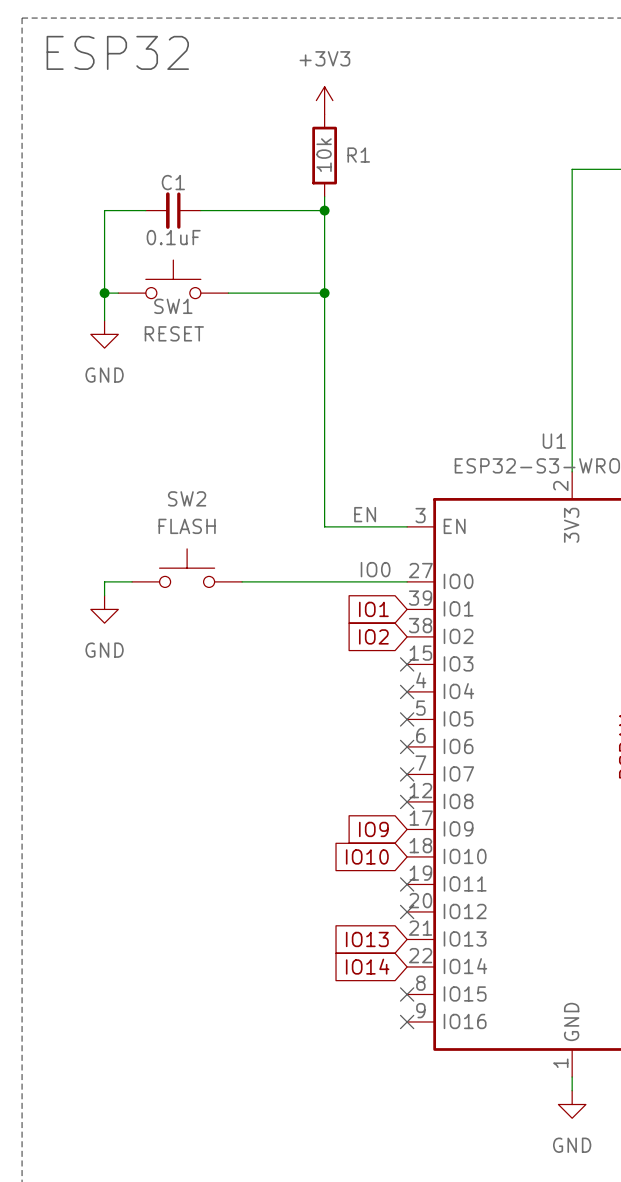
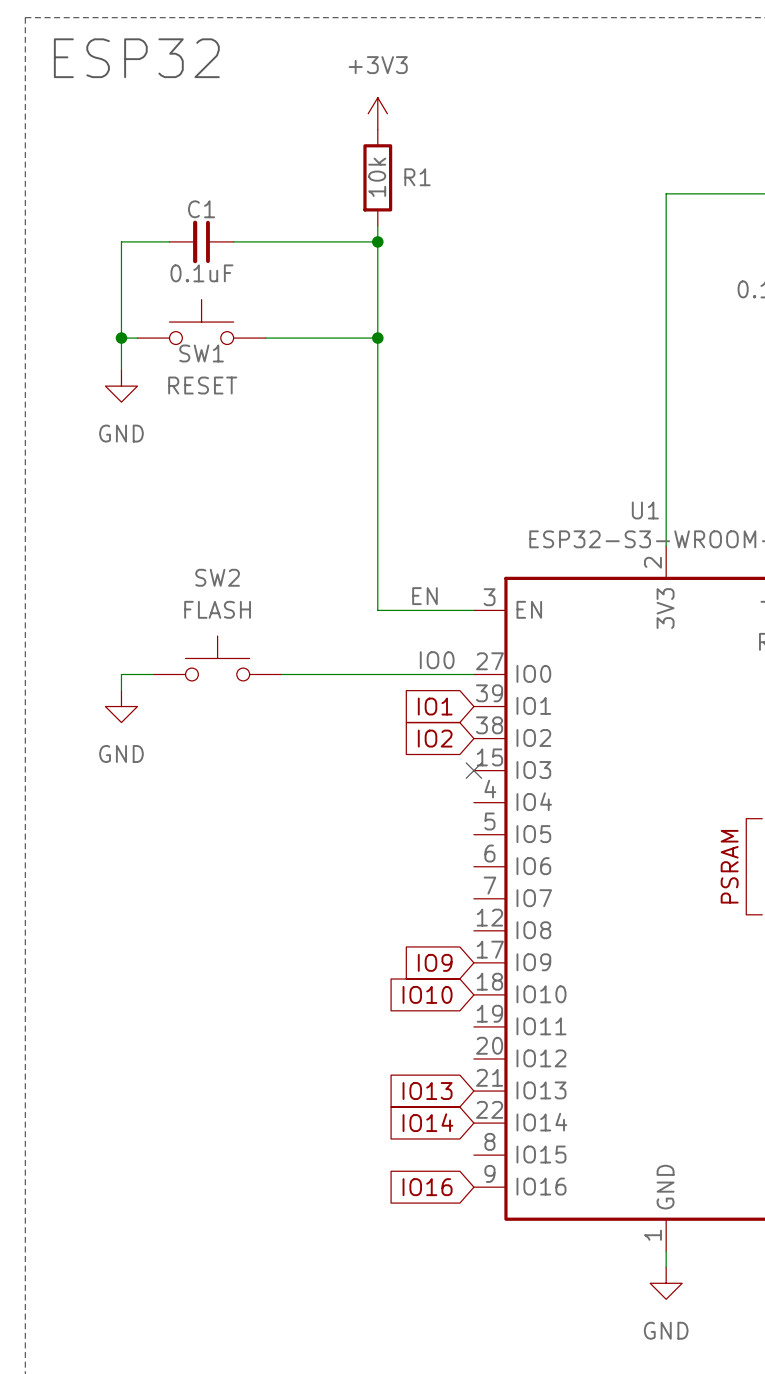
no-connect mark: (407, 691) -> none
no-connect mark: (407, 719) -> none
no-connect mark: (407, 746) -> none
no-connect mark: (407, 774) -> none
no-connect mark: (407, 801) -> none
no-connect mark: (407, 884) -> none
no-connect mark: (407, 911) -> none
no-connect mark: (407, 994) -> none
global label: none -> IO16 (427, 1187)
no-connect mark: (407, 1021) -> none

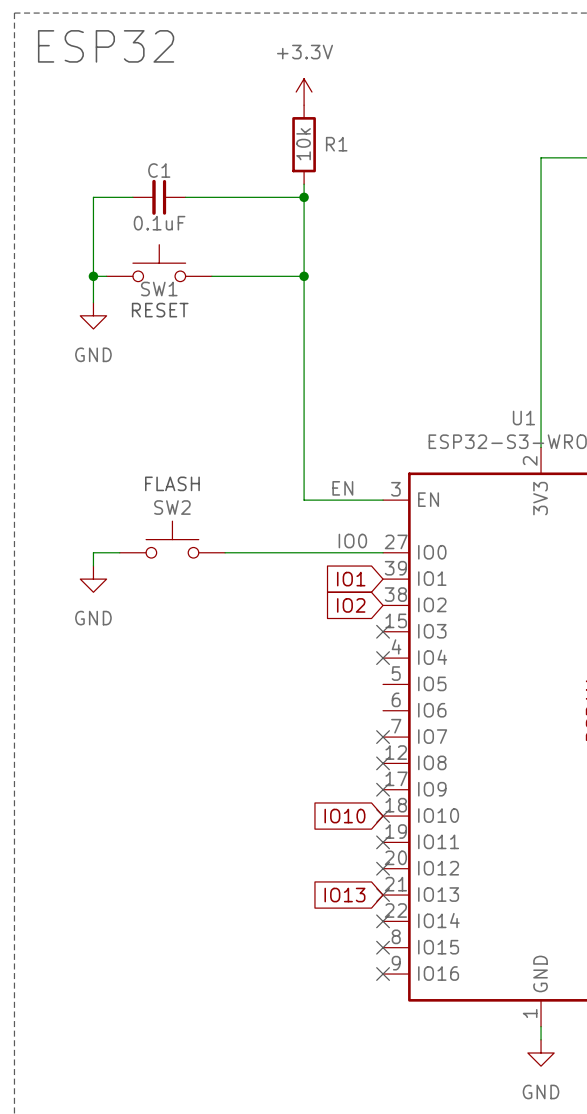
power symbol: +3V3 (377, 113) -> +3.3V (304, 92)
text: none -> RESET (160, 310)
SW1 value: RESET (202, 385) -> none
SW2 name position: SW2 (217, 577) -> SW2 (172, 507)
text: none -> FLASH (172, 483)
SW2 value: FLASH (217, 609) -> none
no-connect mark: none -> (383, 658)
no-connect mark: none -> (383, 737)
no-connect mark: none -> (383, 763)
global label: IO9 (435, 962) -> none
no-connect mark: none -> (383, 789)
no-connect mark: none -> (383, 816)
no-connect mark: none -> (383, 842)
no-connect mark: none -> (383, 868)
no-connect mark: none -> (383, 895)
global label: IO14 (427, 1122) -> none
no-connect mark: none -> (383, 921)
no-connect mark: none -> (383, 947)
global label: IO16 (427, 1187) -> none
no-connect mark: none -> (383, 974)

